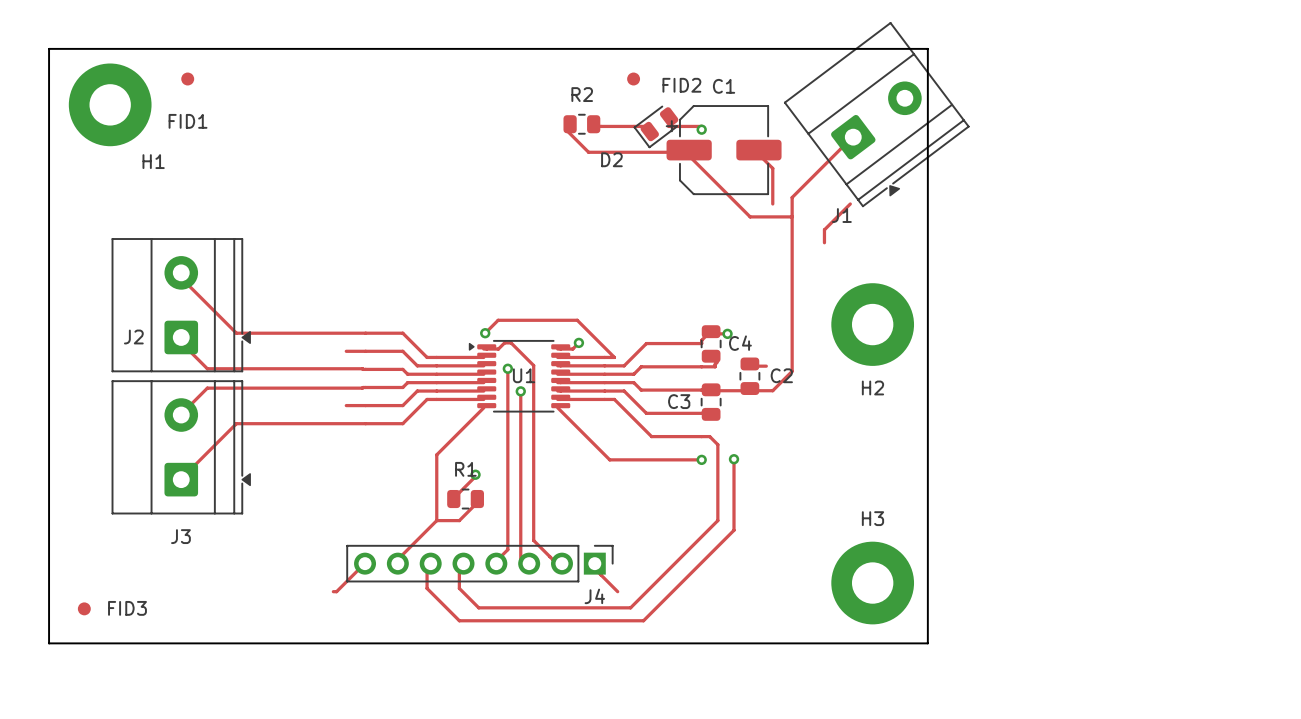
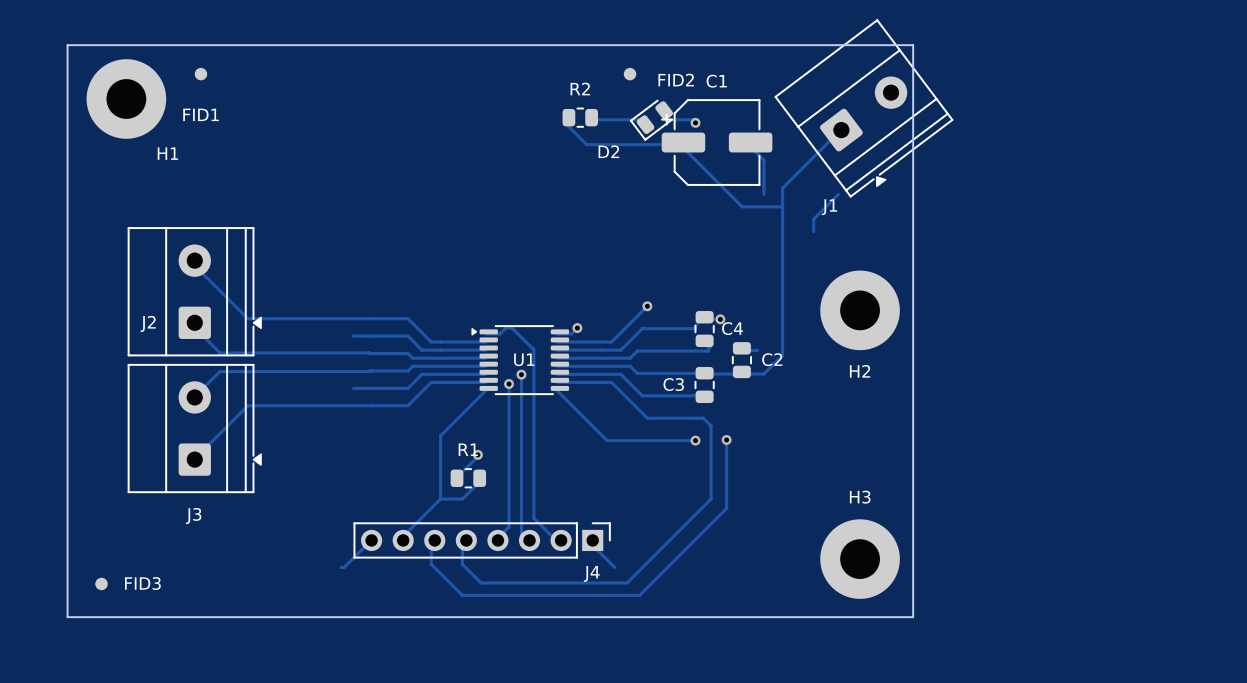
via: none -> (647, 306)
track: (485, 333) (498, 320) (577, 320) (614, 357) -> (647, 306) (611, 342)
via: (485, 333) -> none
track: (507, 368) (507, 401) -> none
via position: (507, 368) -> (509, 384)

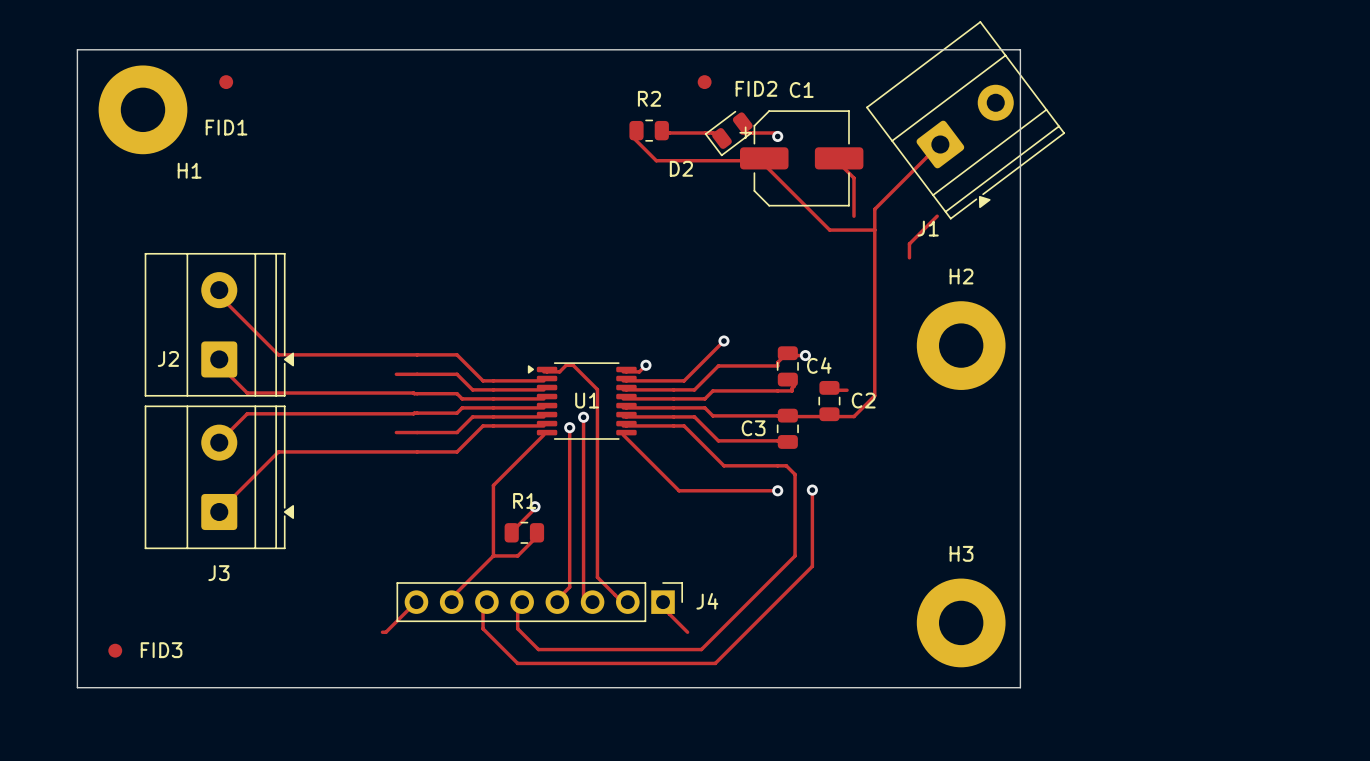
H2 name position: H2 (860, 371) -> H2 (961, 276)
J4 name position: J4 (591, 573) -> J4 (707, 601)

